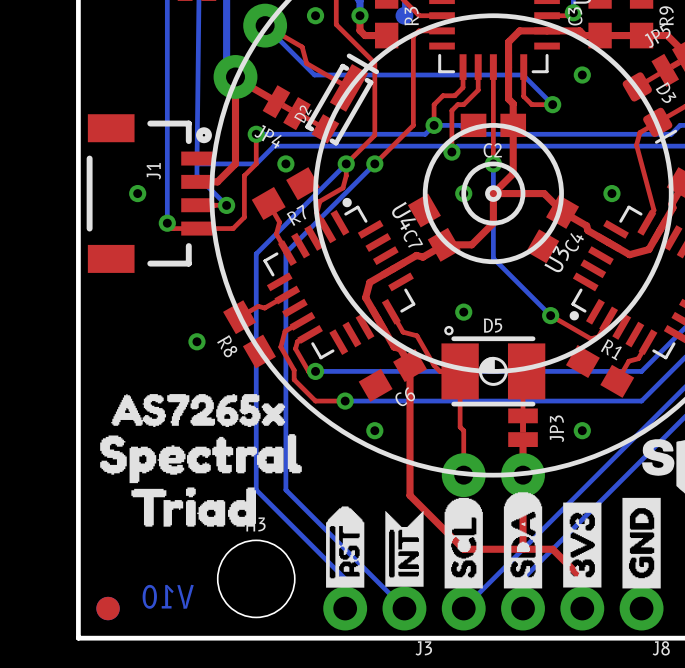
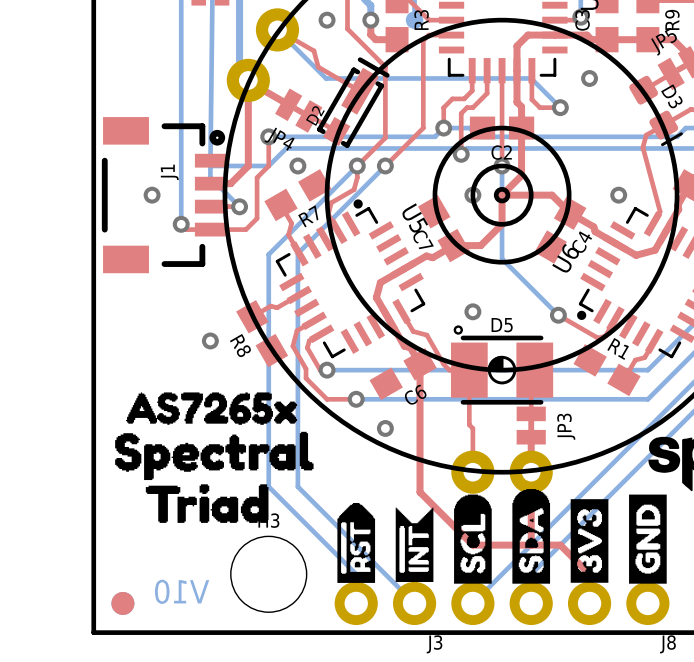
U4 name: U4 (404, 215) -> U5 (415, 218)
U3 name: U3 (556, 258) -> U6 (565, 258)
via: (582, 430) -> none

